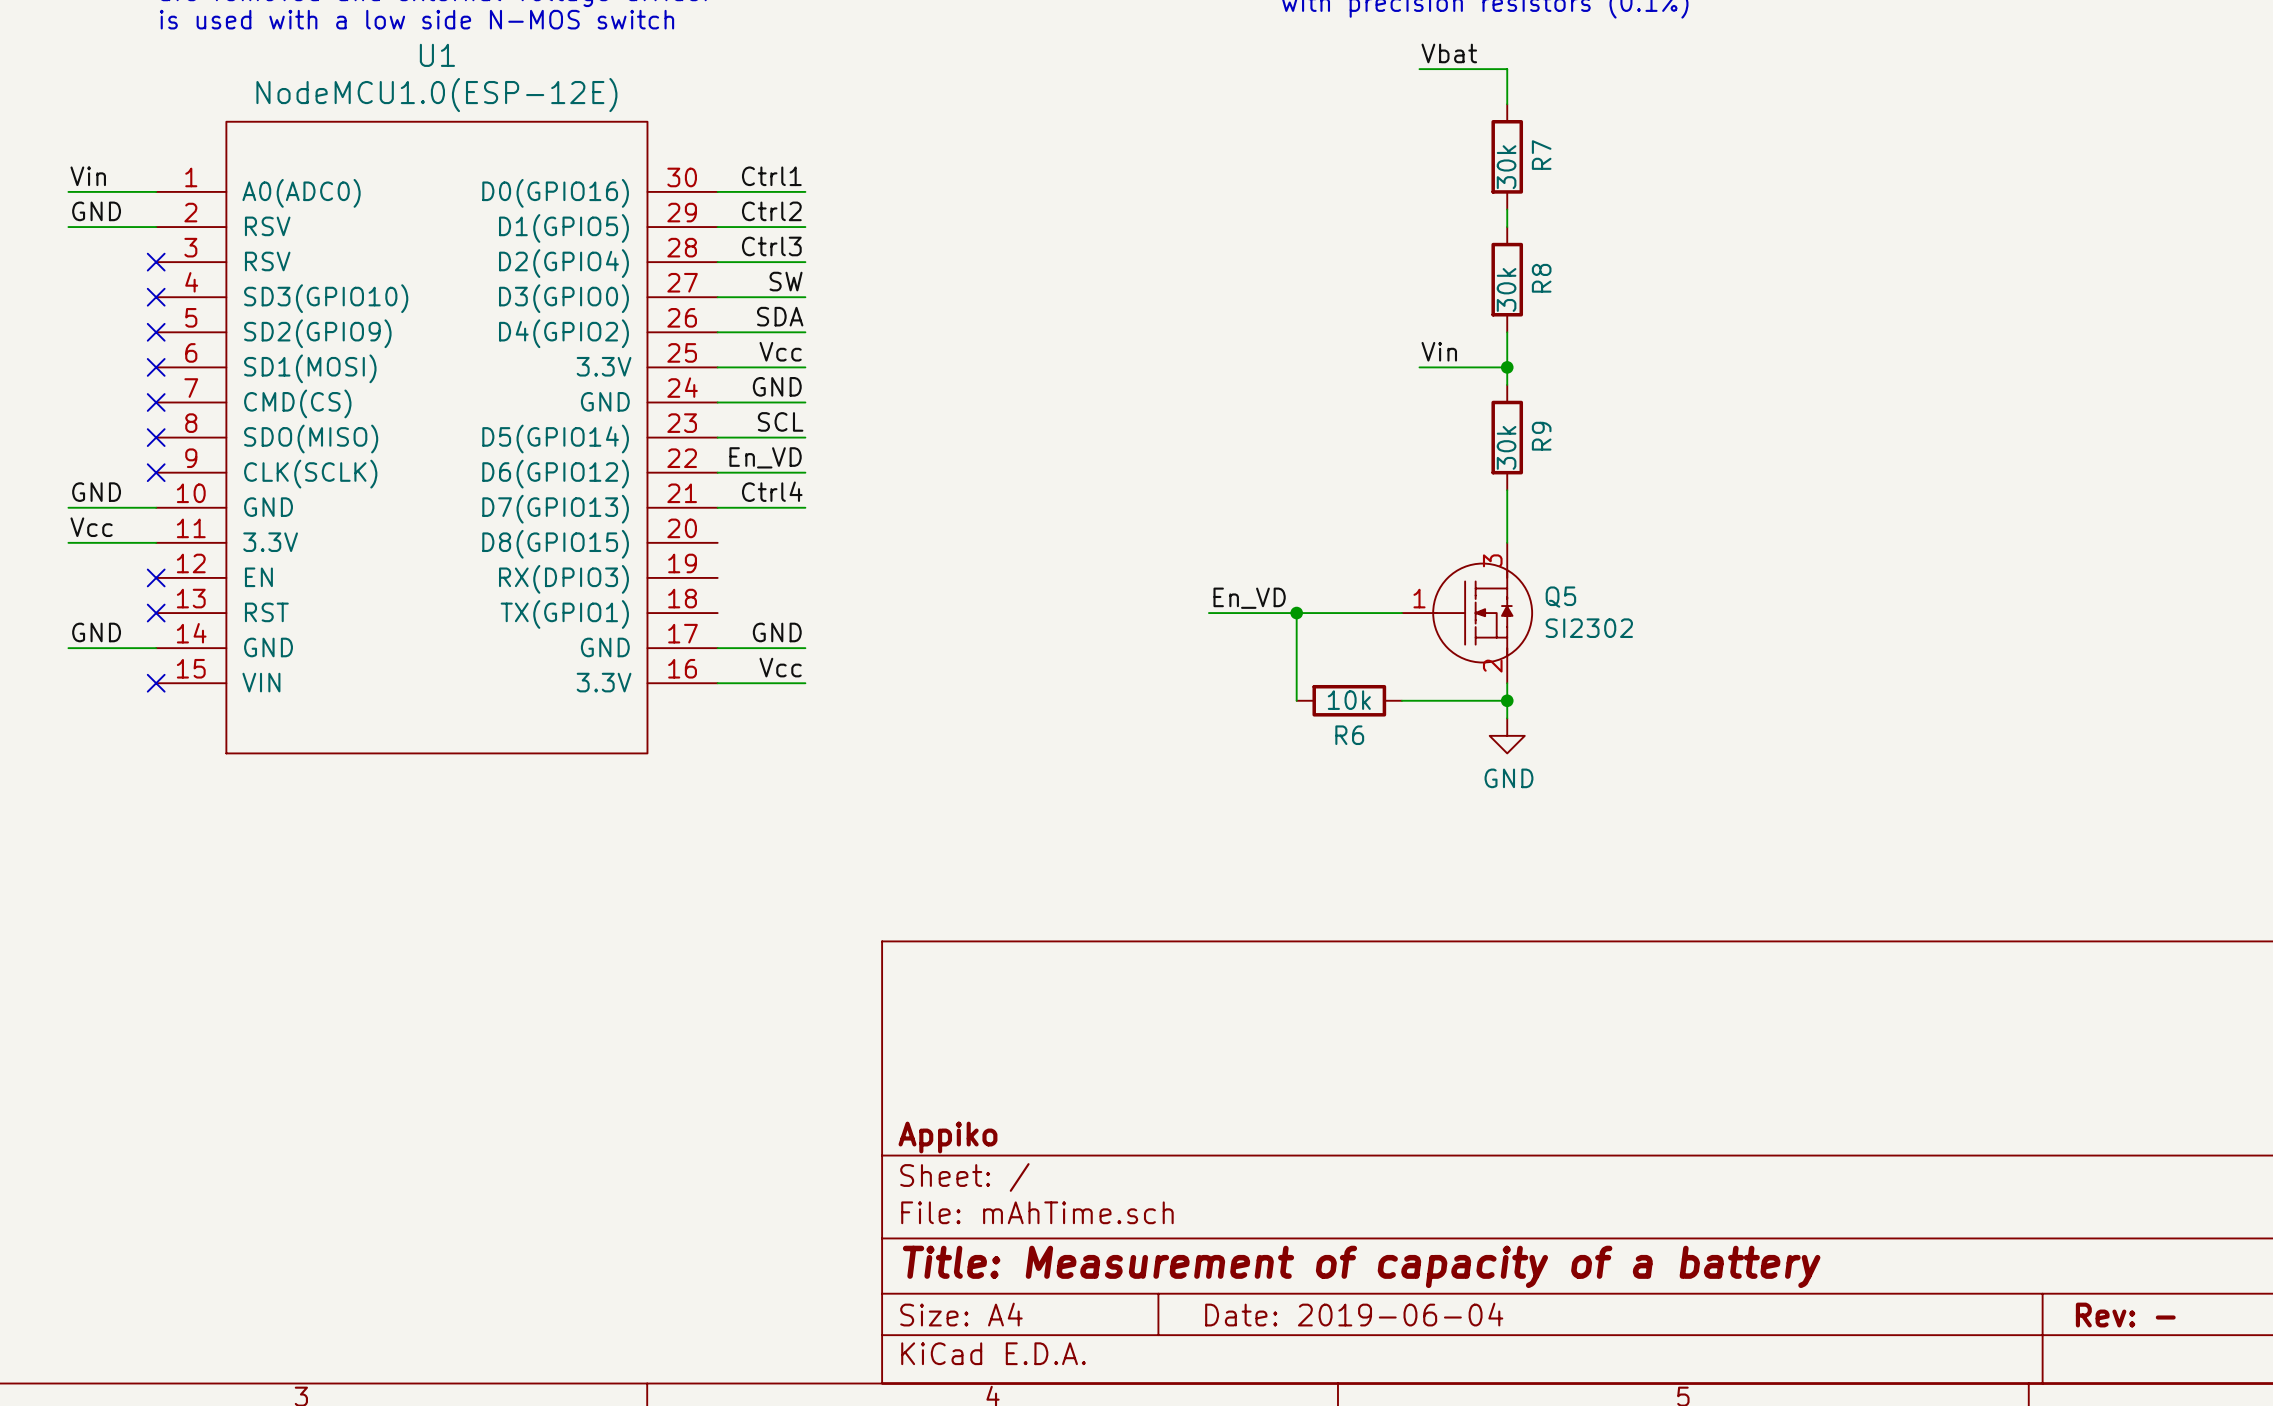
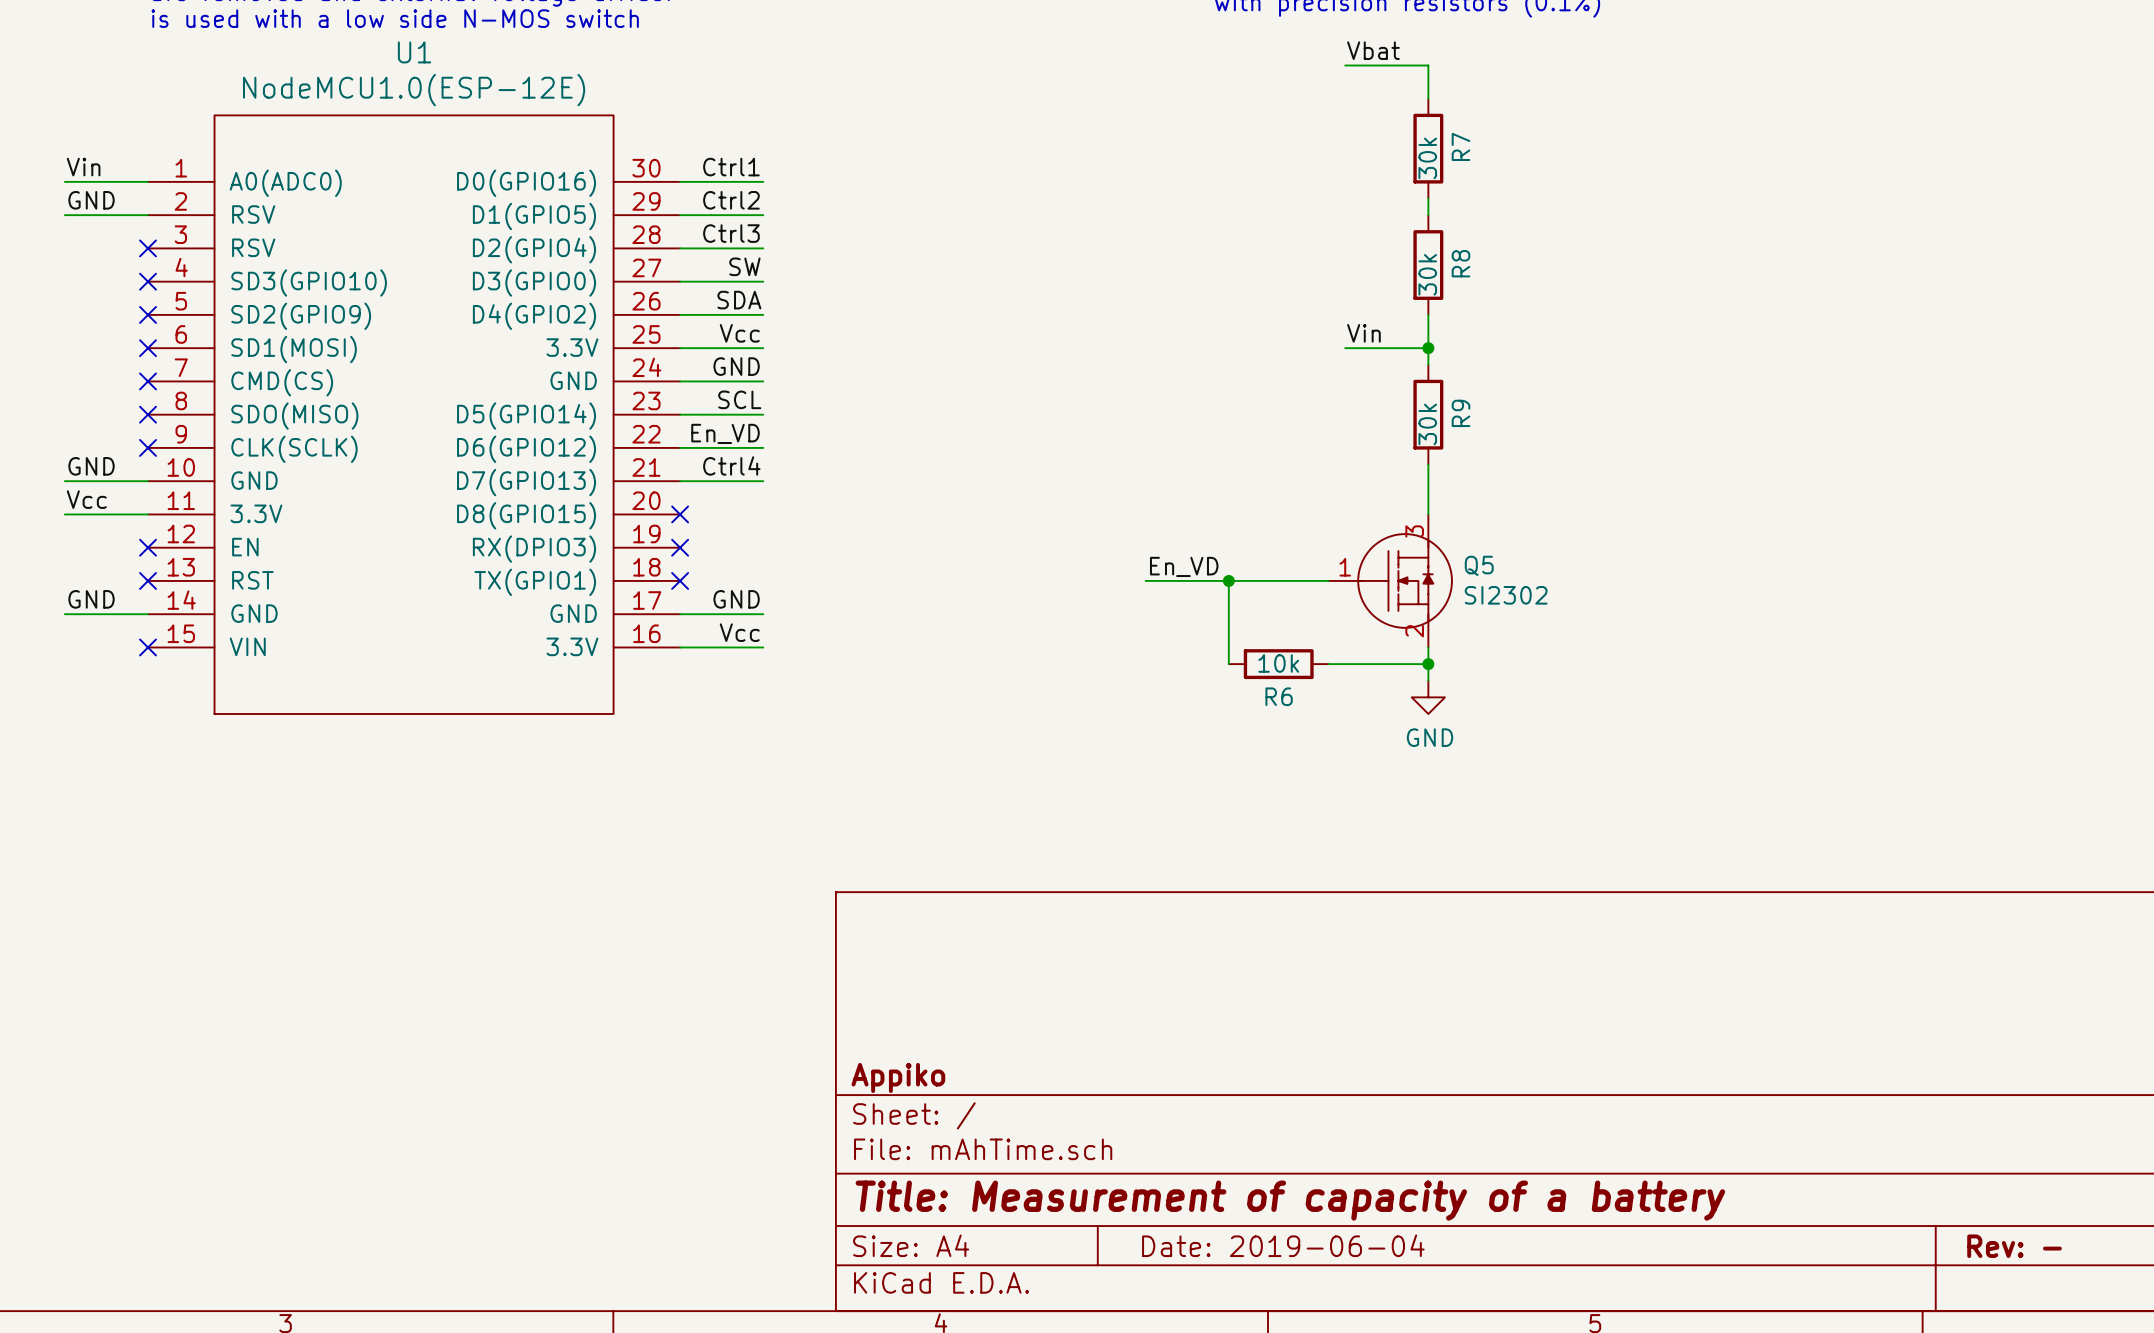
no-connect mark: none -> (680, 514)
no-connect mark: none -> (680, 547)
no-connect mark: none -> (680, 580)

